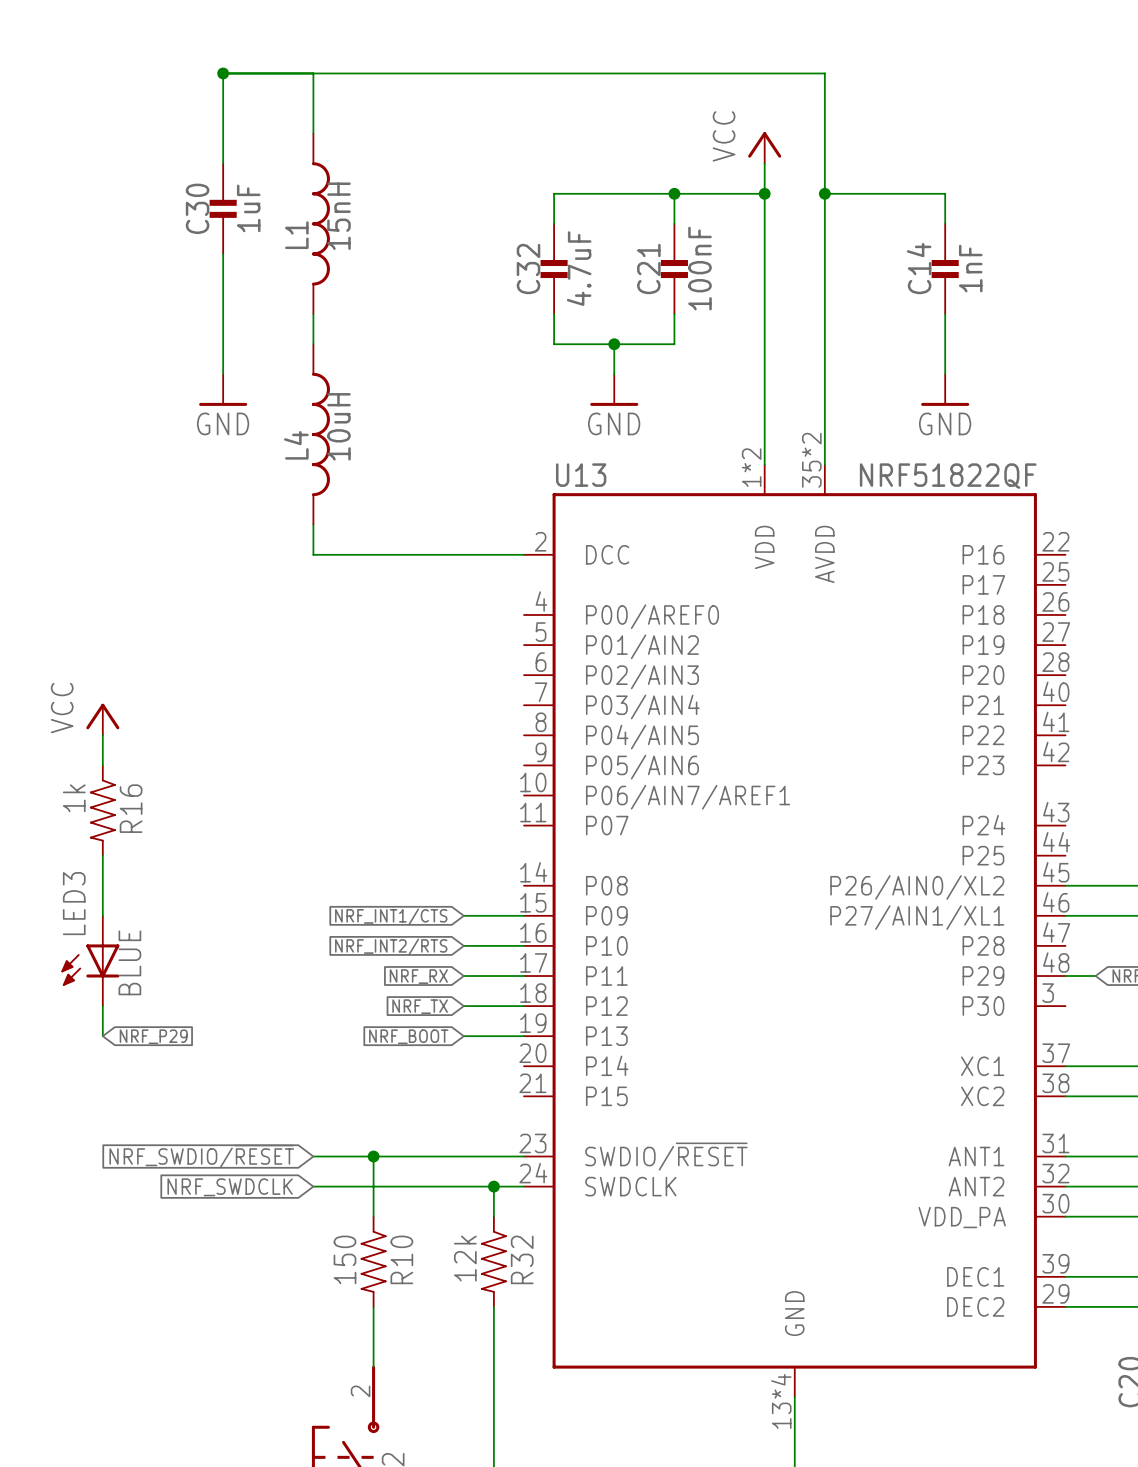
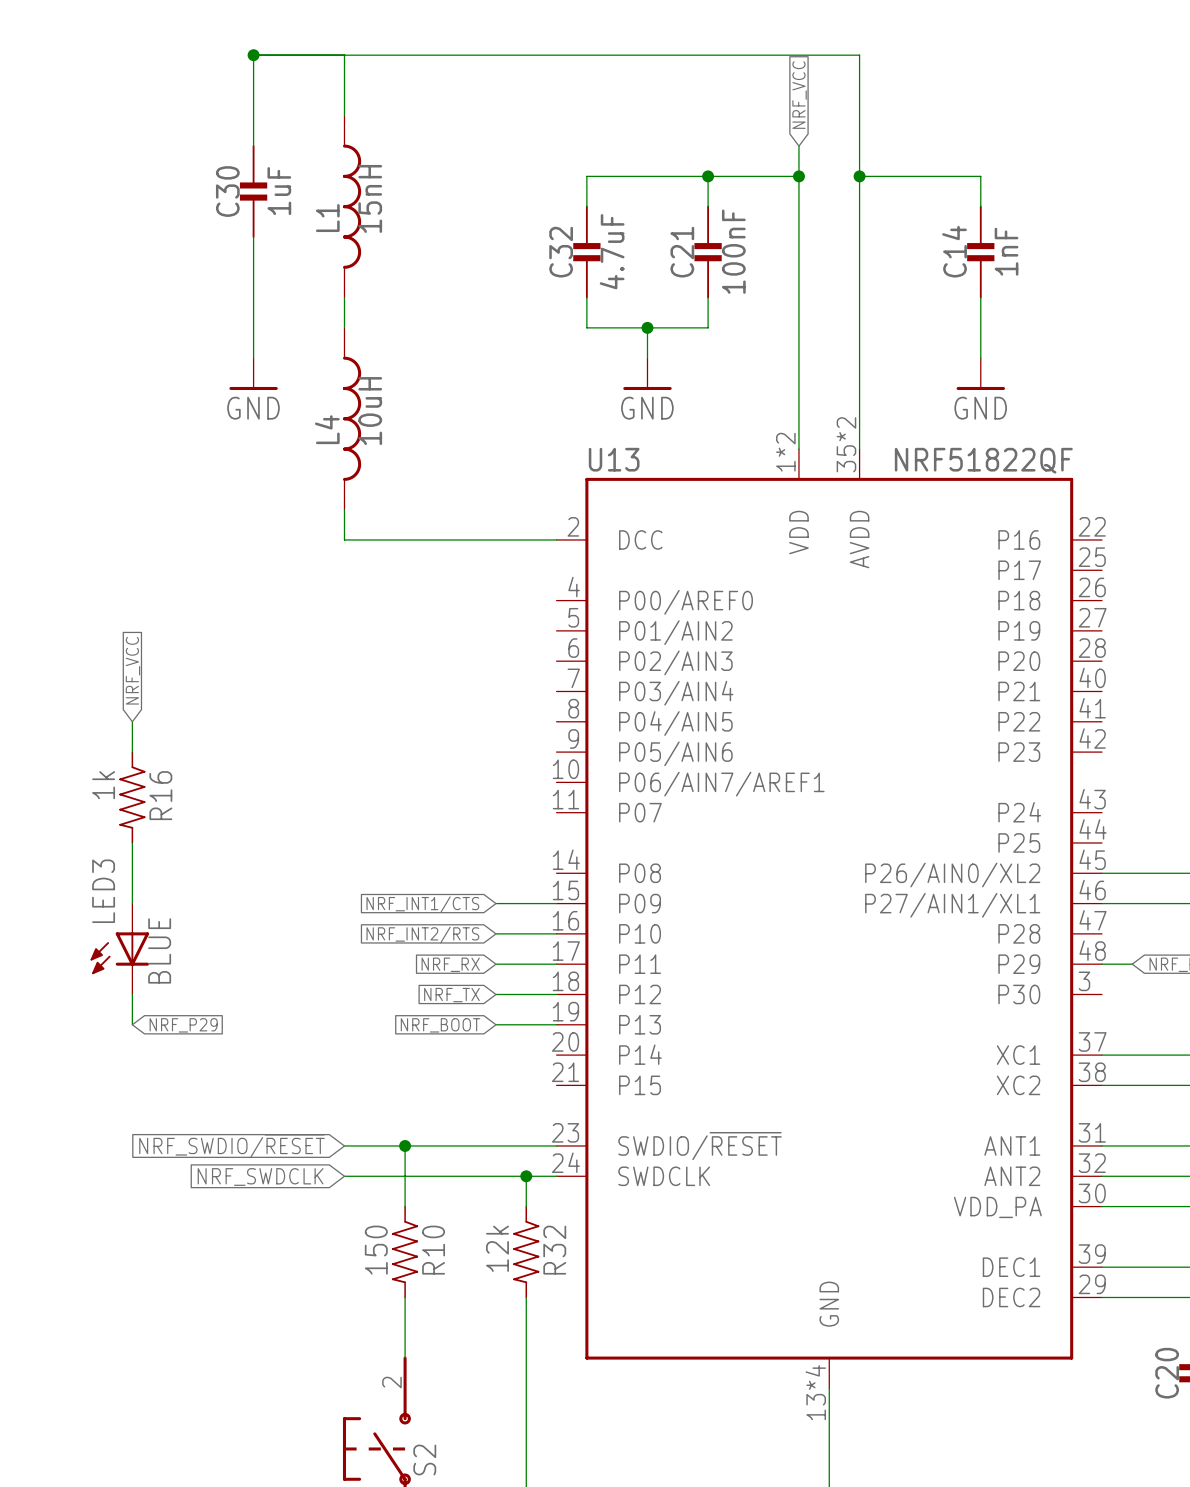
global label: none -> NRF_VCC (799, 95)
power symbol: VCC (764, 147) -> none
global label: none -> NRF_VCC (132, 670)
power symbol: VCC (102, 719) -> none

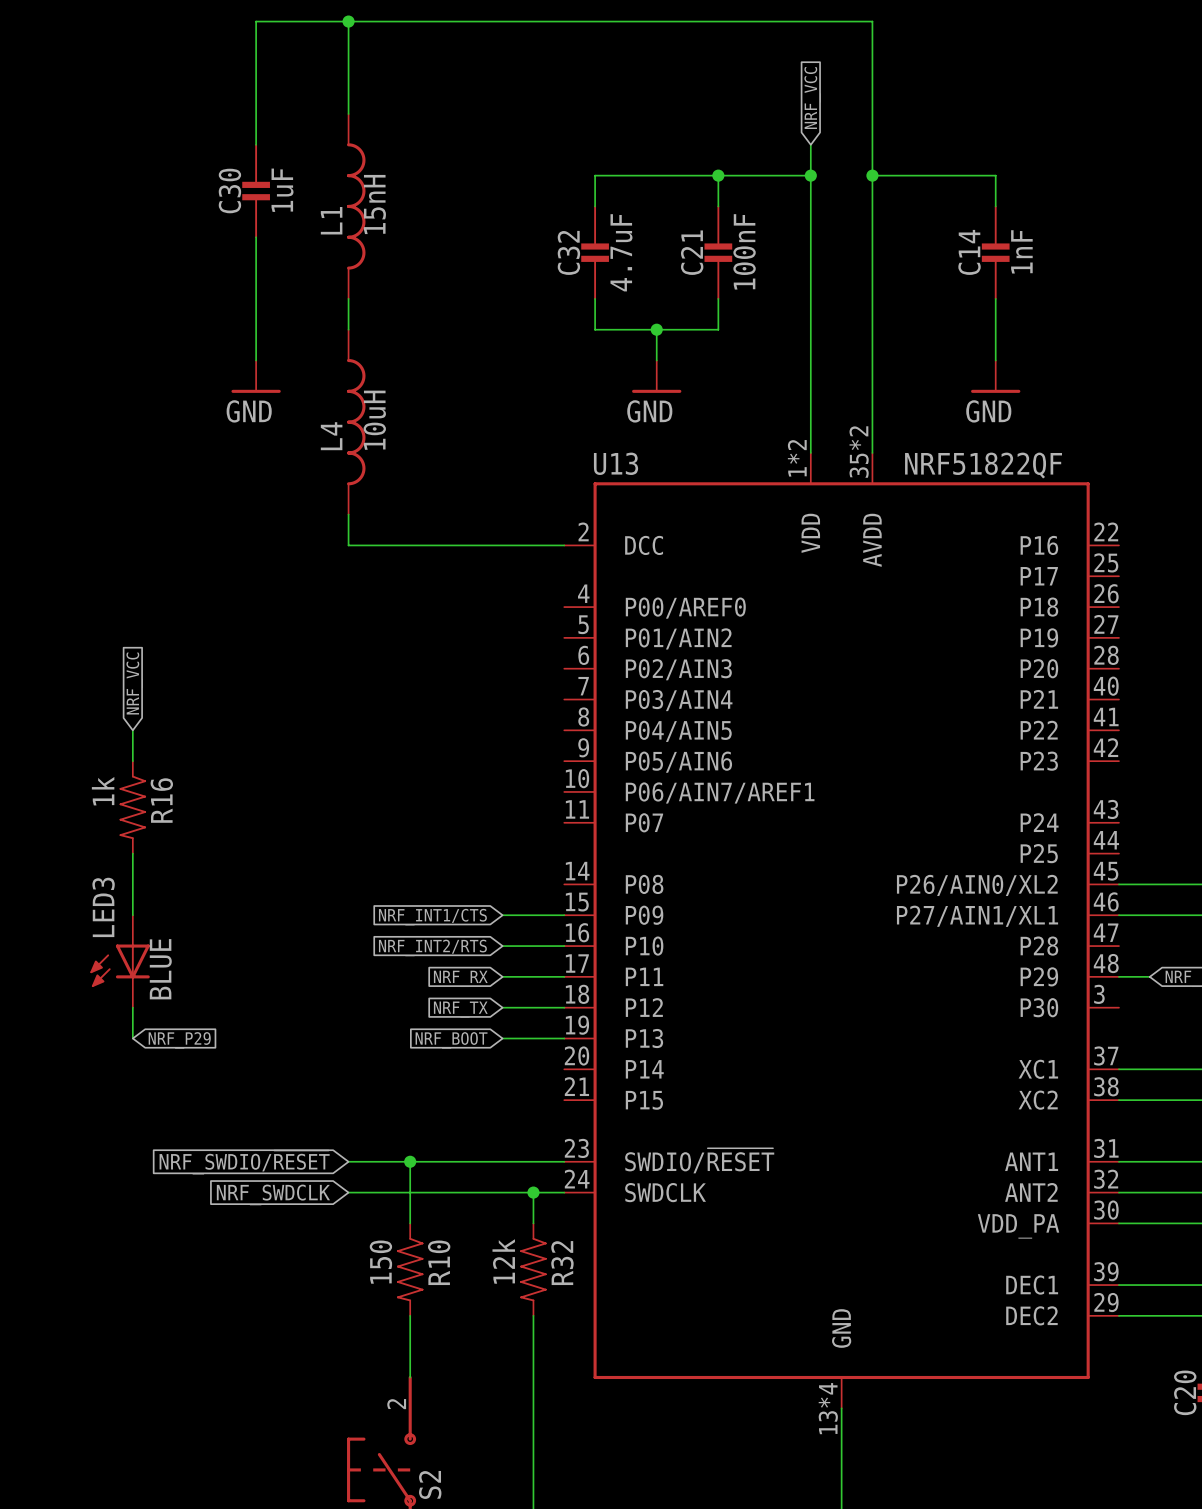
wire: none -> (348, 21) (348, 52)
junction: none -> (348, 21)
wire: (253, 55) (859, 55) -> (256, 52) (256, 21) (872, 21) (872, 52)
junction: (253, 55) -> none

